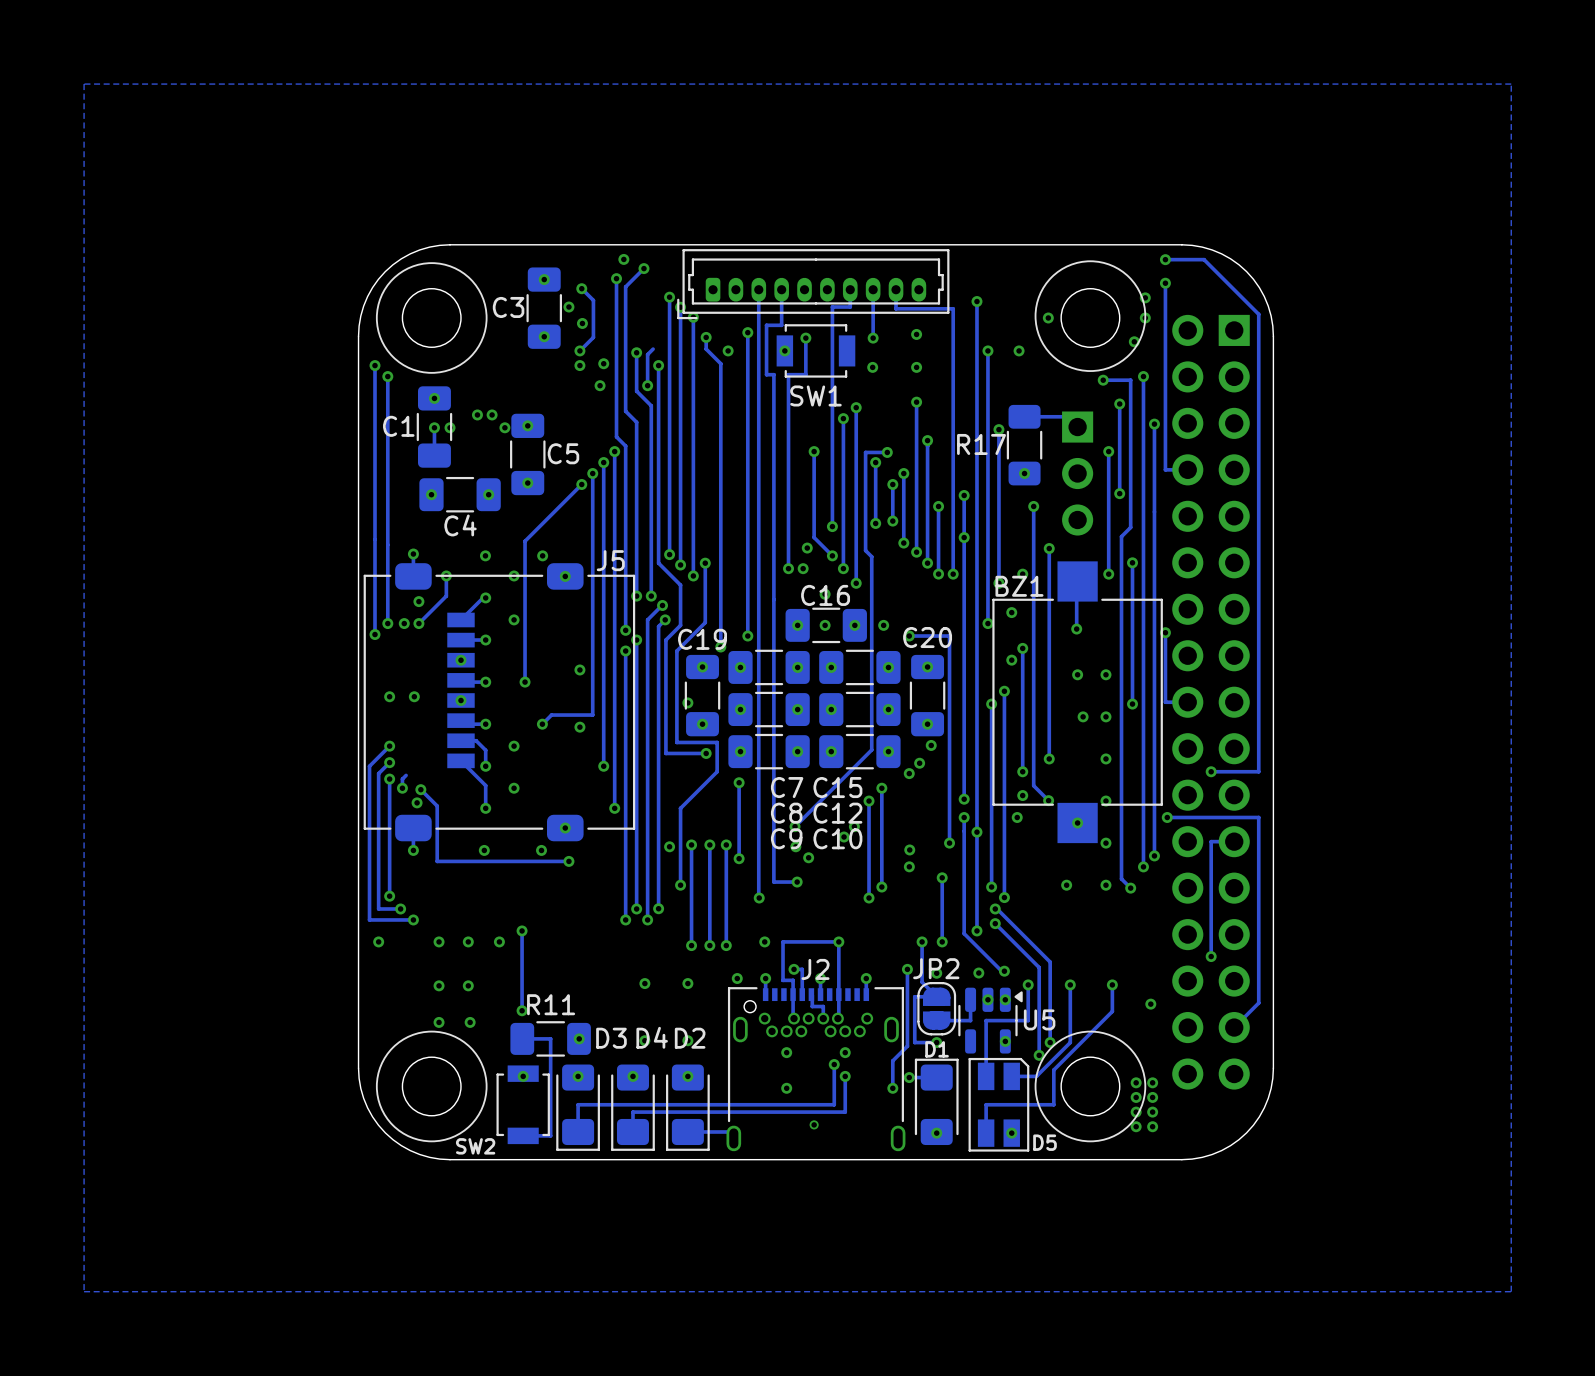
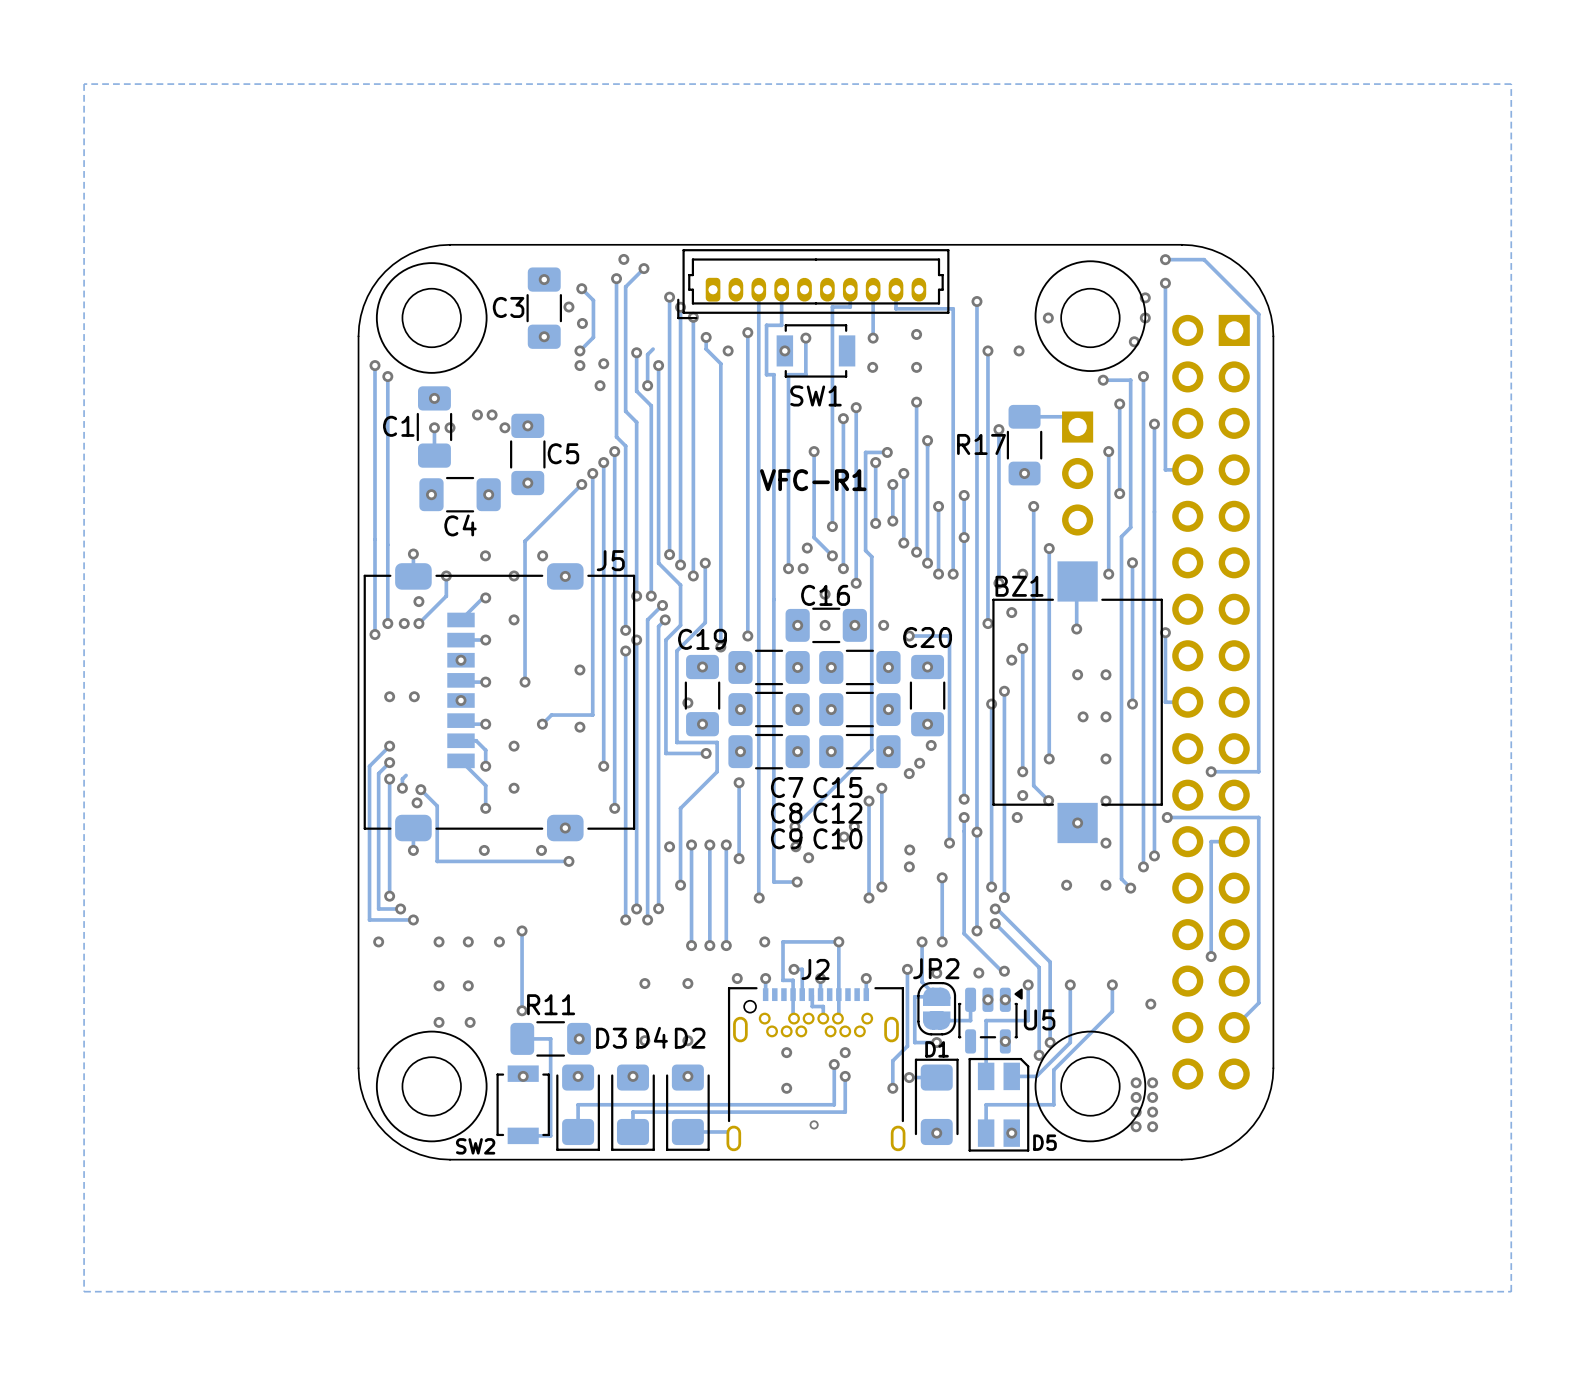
text: none -> VFC-R1 (813, 480)
U5 footprint: [958, 987, 1023, 1054] -> [958, 987, 1023, 1054]

